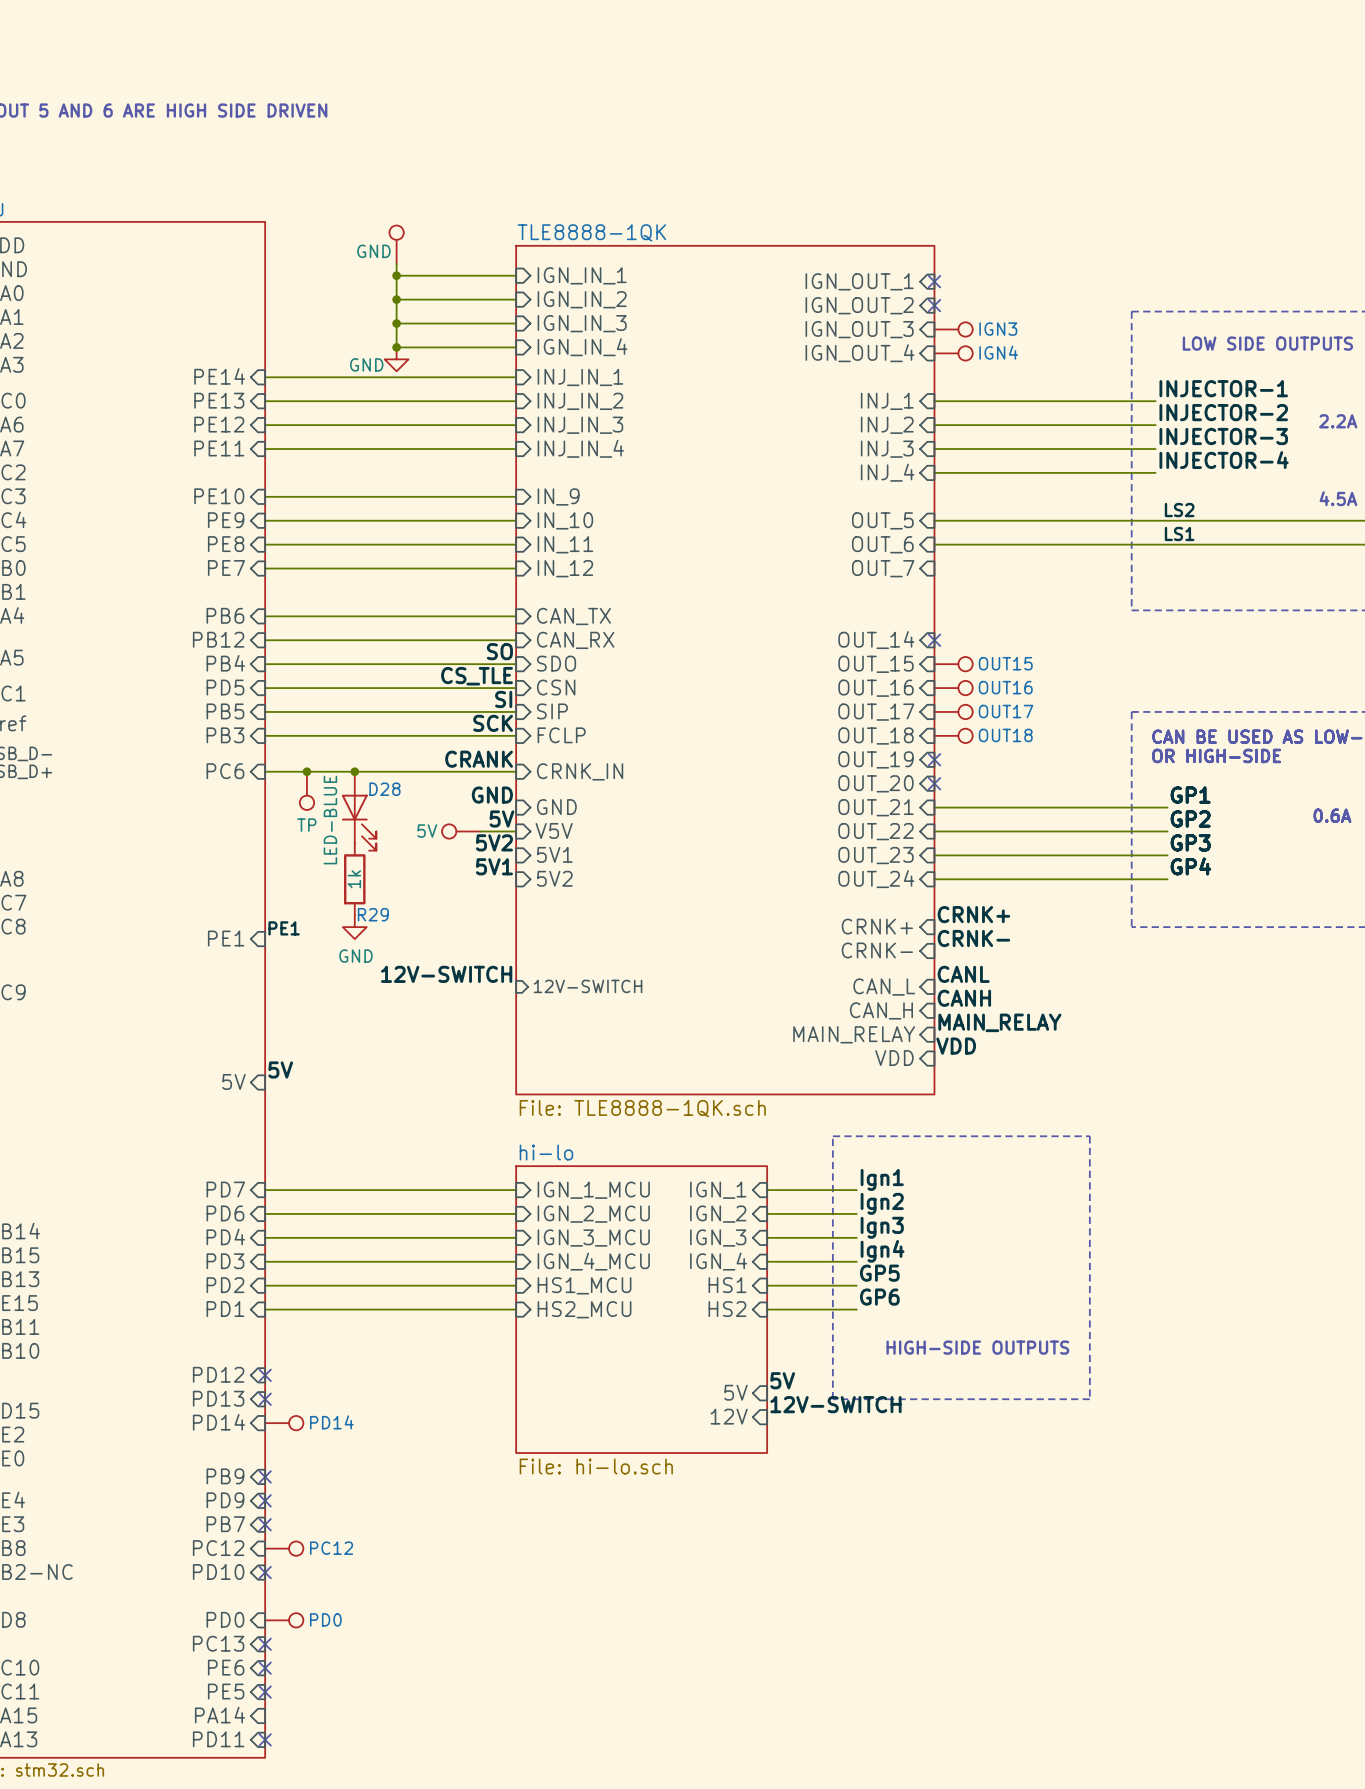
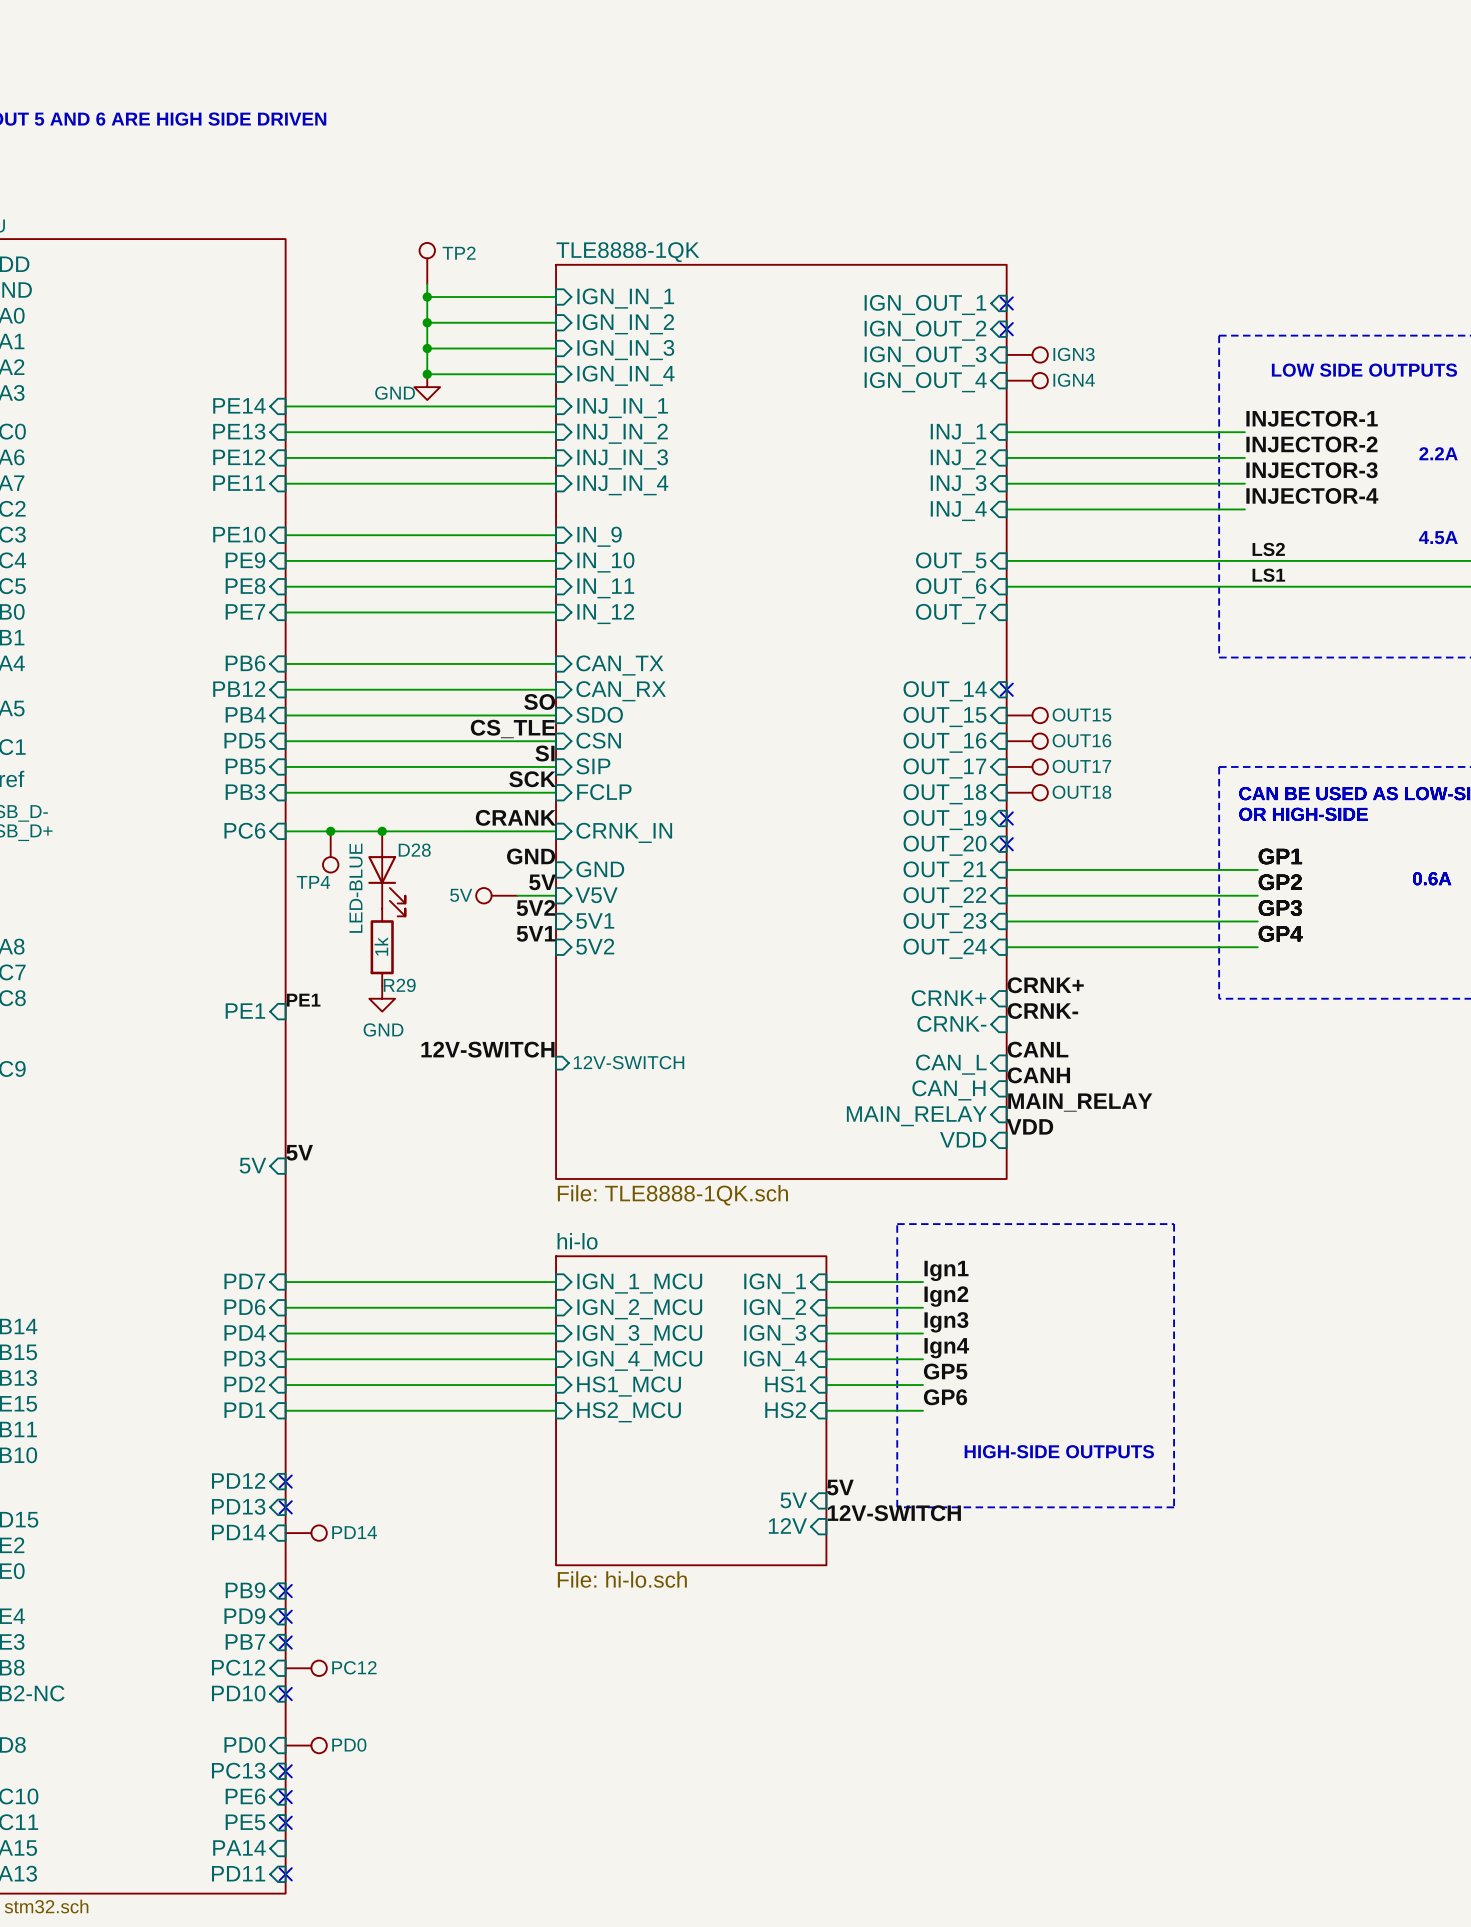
TP2 name: none -> TP2 (459, 253)
TP2 value: GND (373, 251) -> none
TP4 name: none -> TP4 (313, 882)
TP4 value: TP (306, 825) -> none

